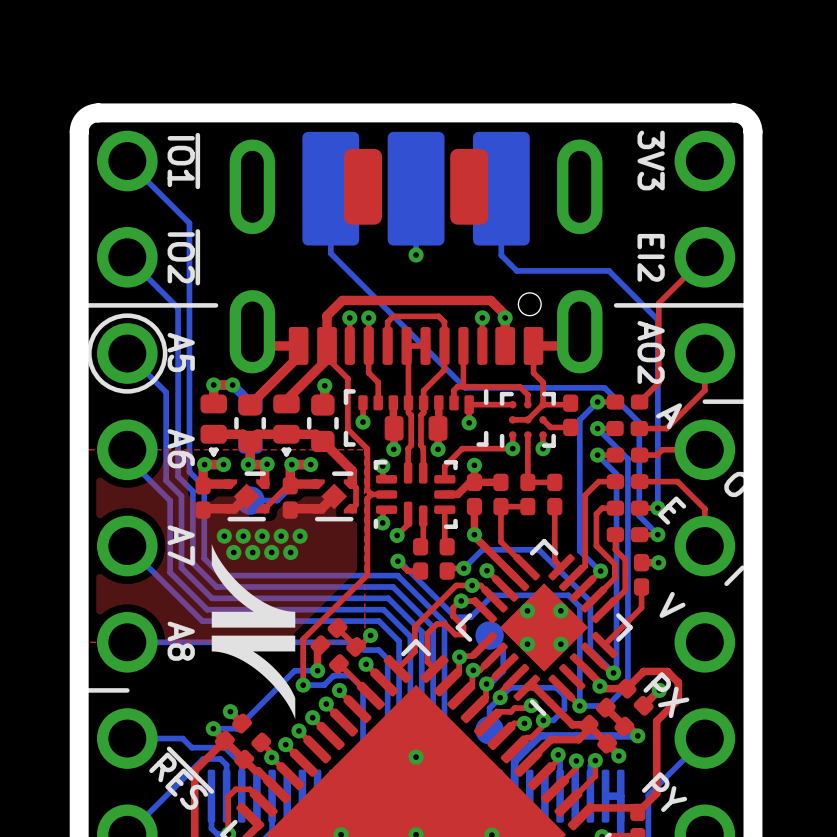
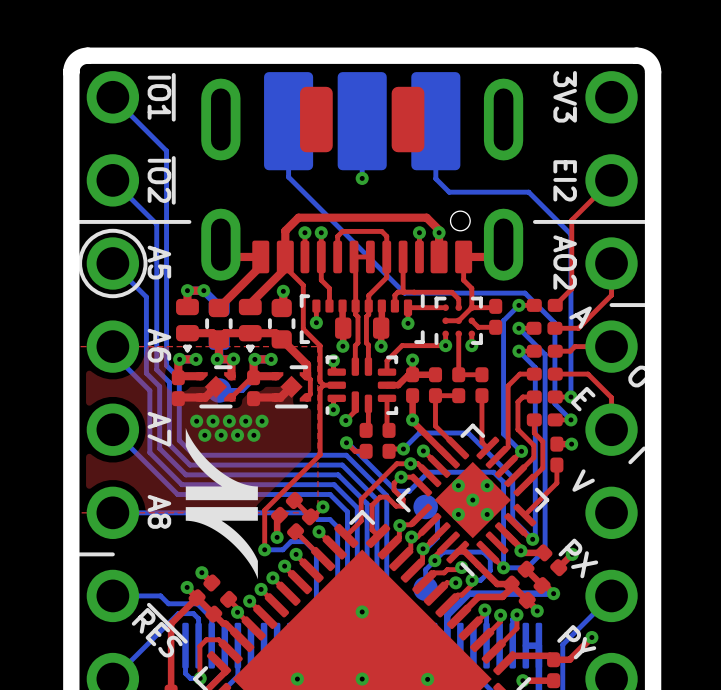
via: none -> (472, 500)
bottom track: (317, 670) (294, 670) (236, 728) (213, 728) -> none
top track: (626, 688) (643, 671) (667, 671) (678, 682) (678, 699) (656, 721) (656, 793) (637, 812) -> (591, 635) (591, 637) (569, 659) (553, 659)
via: none -> (591, 637)

